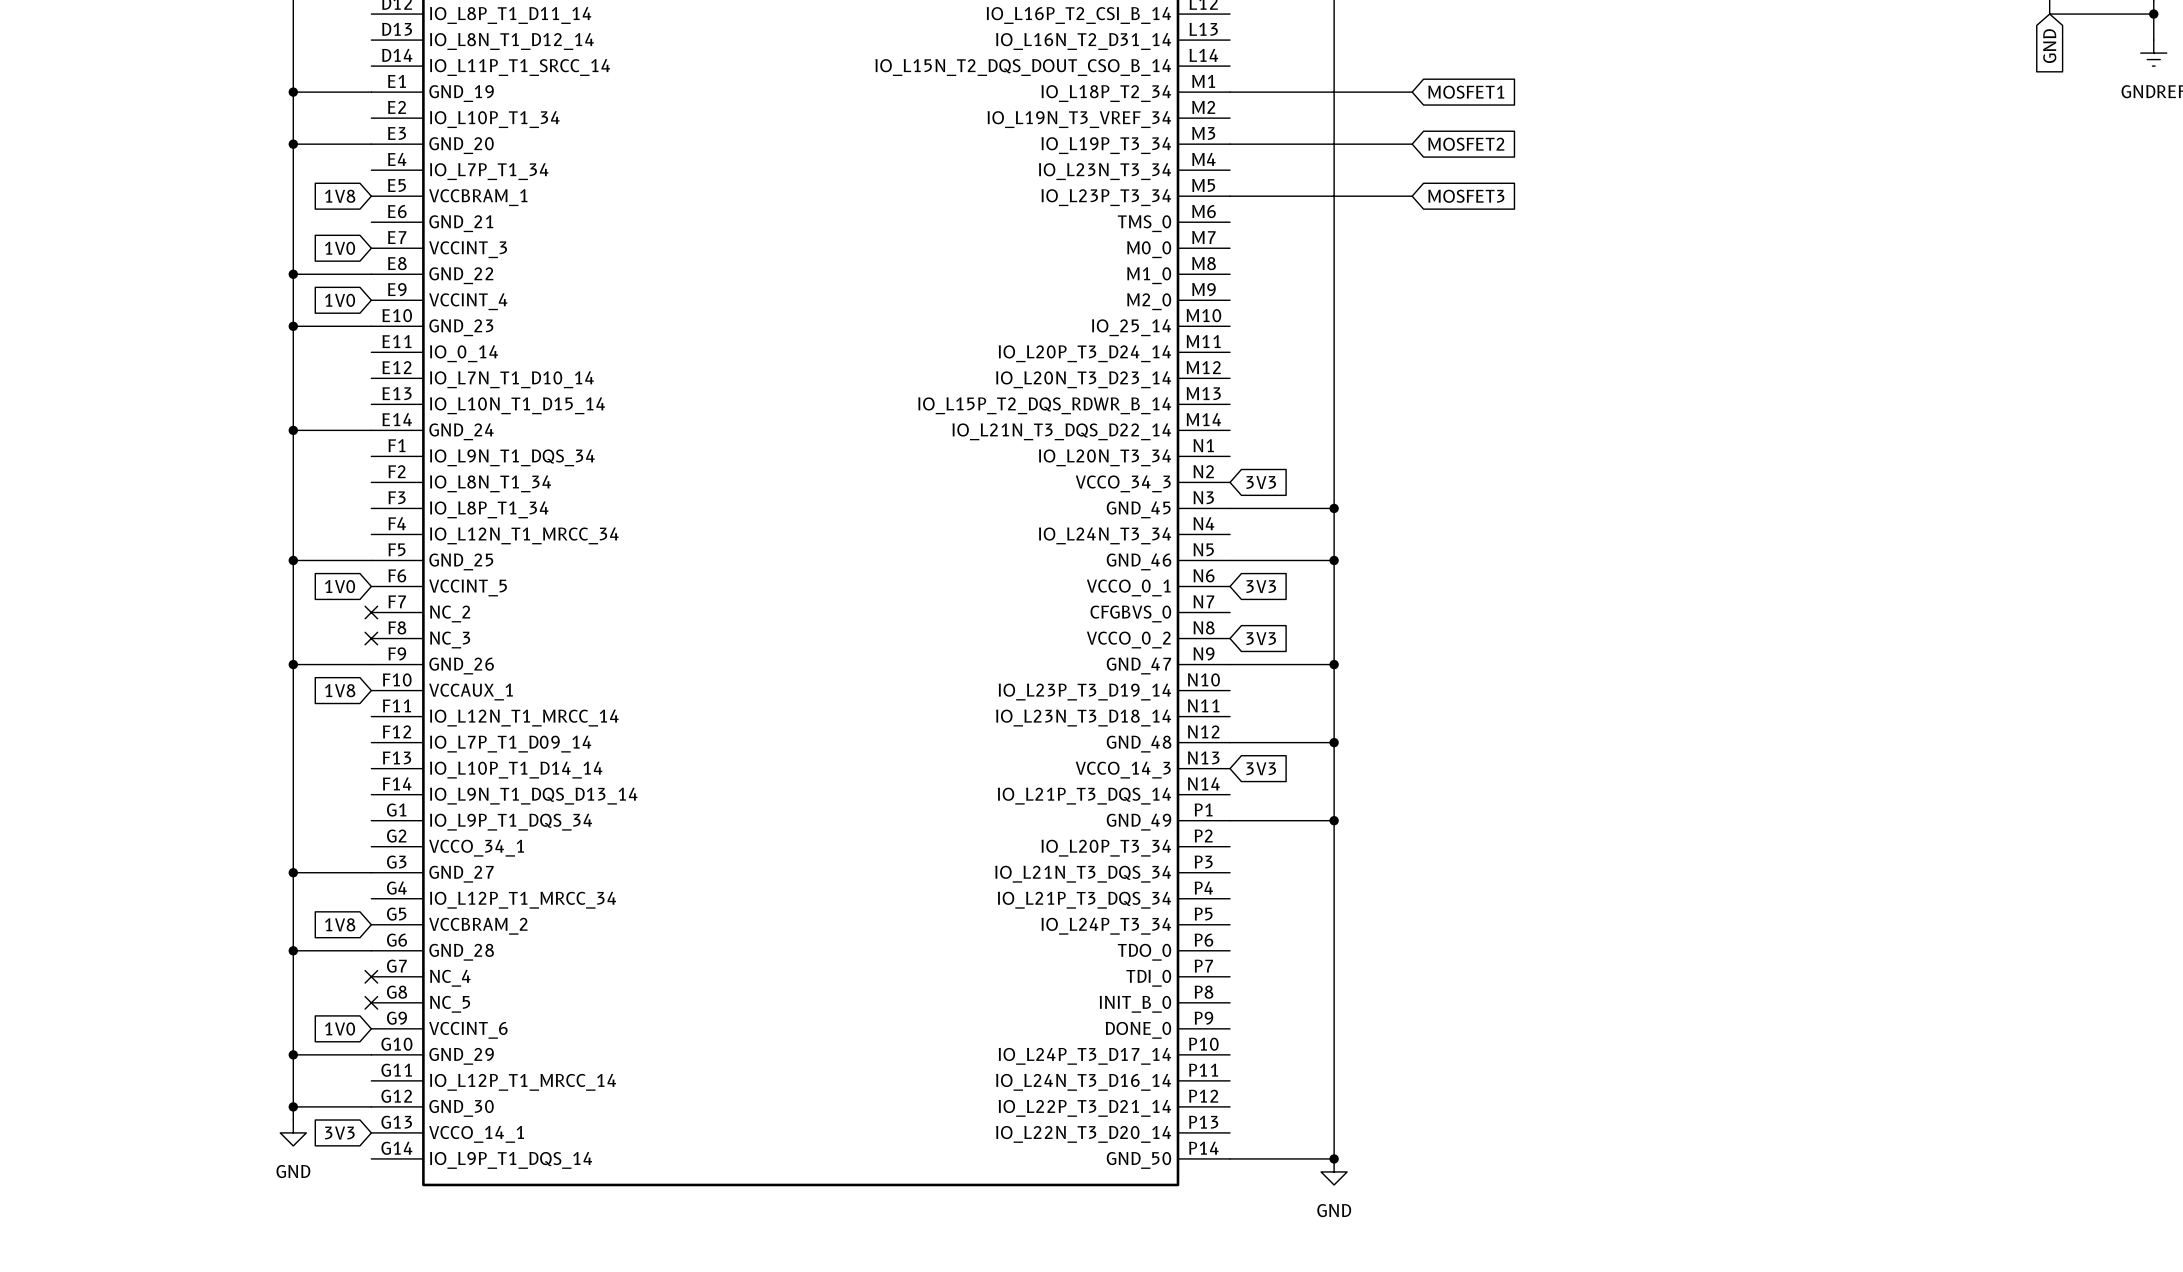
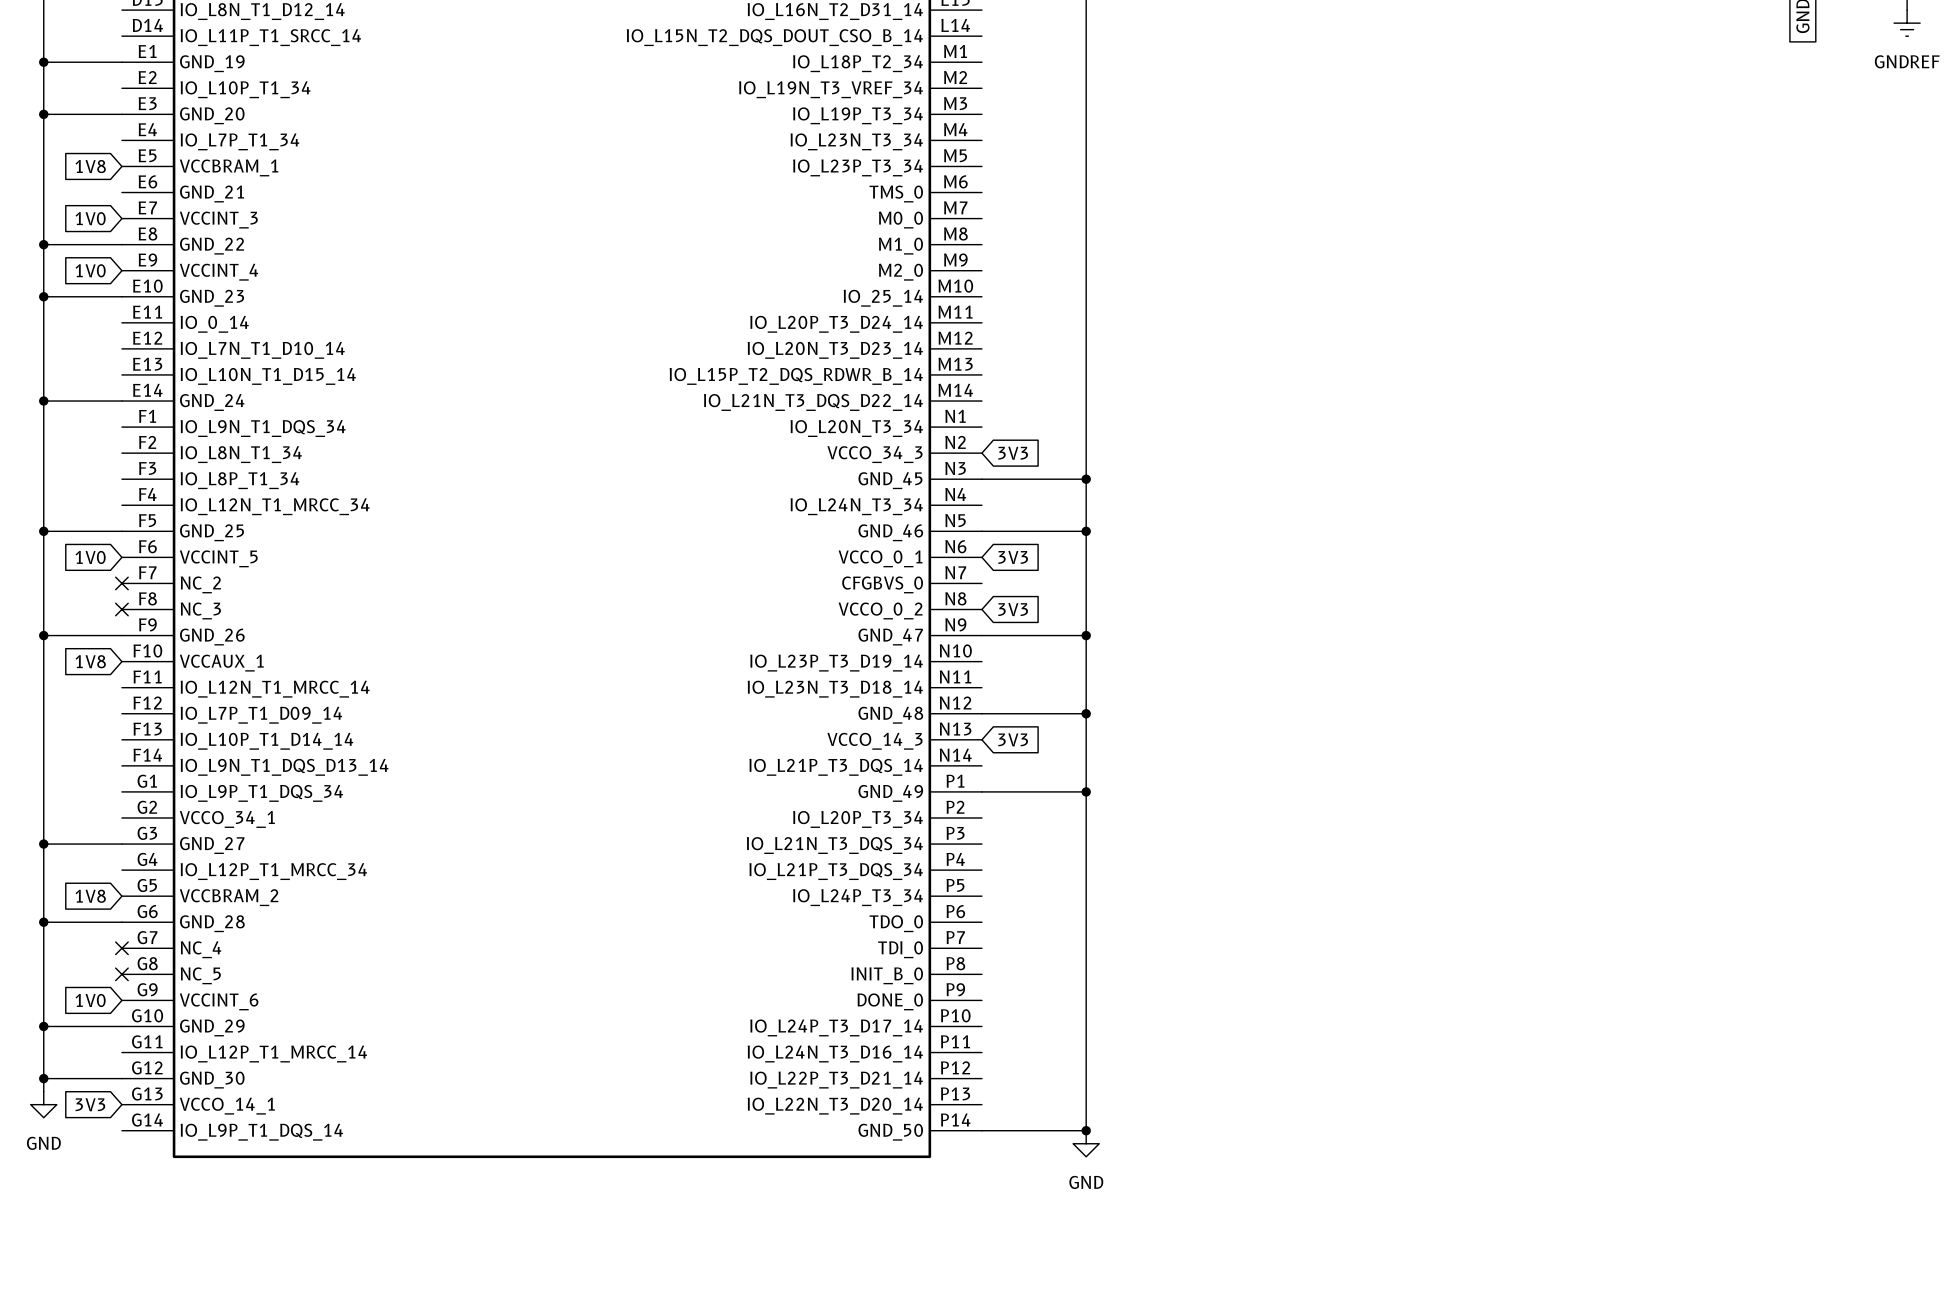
wire: (1230, 92) (1412, 92) -> none
global label: MOSFET1 (1466, 92) -> none
wire: (1230, 144) (1412, 144) -> none
global label: MOSFET2 (1466, 144) -> none
wire: (1230, 196) (1412, 196) -> none
global label: MOSFET3 (1466, 196) -> none

